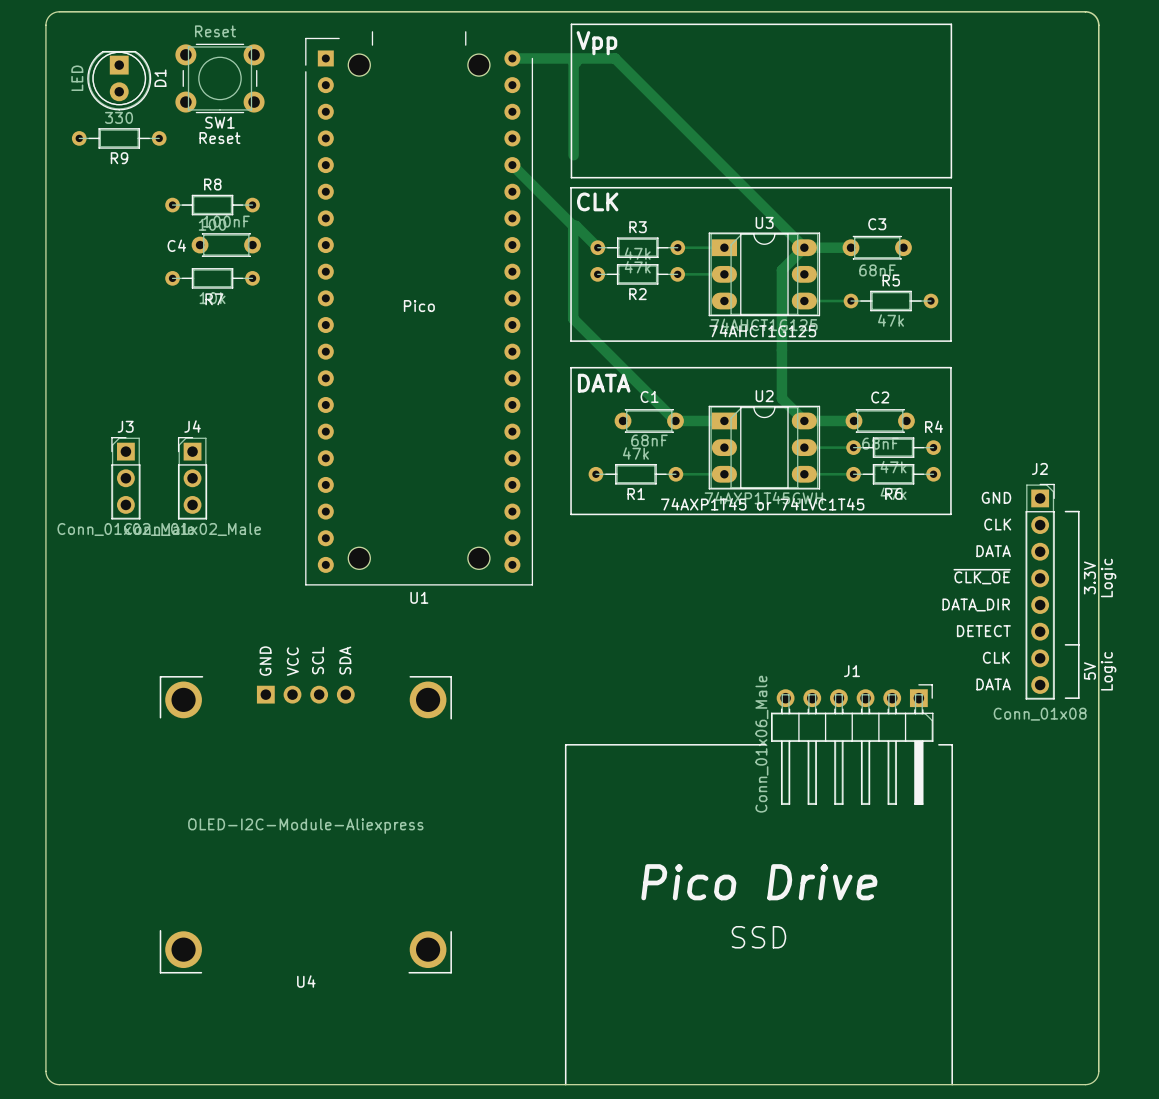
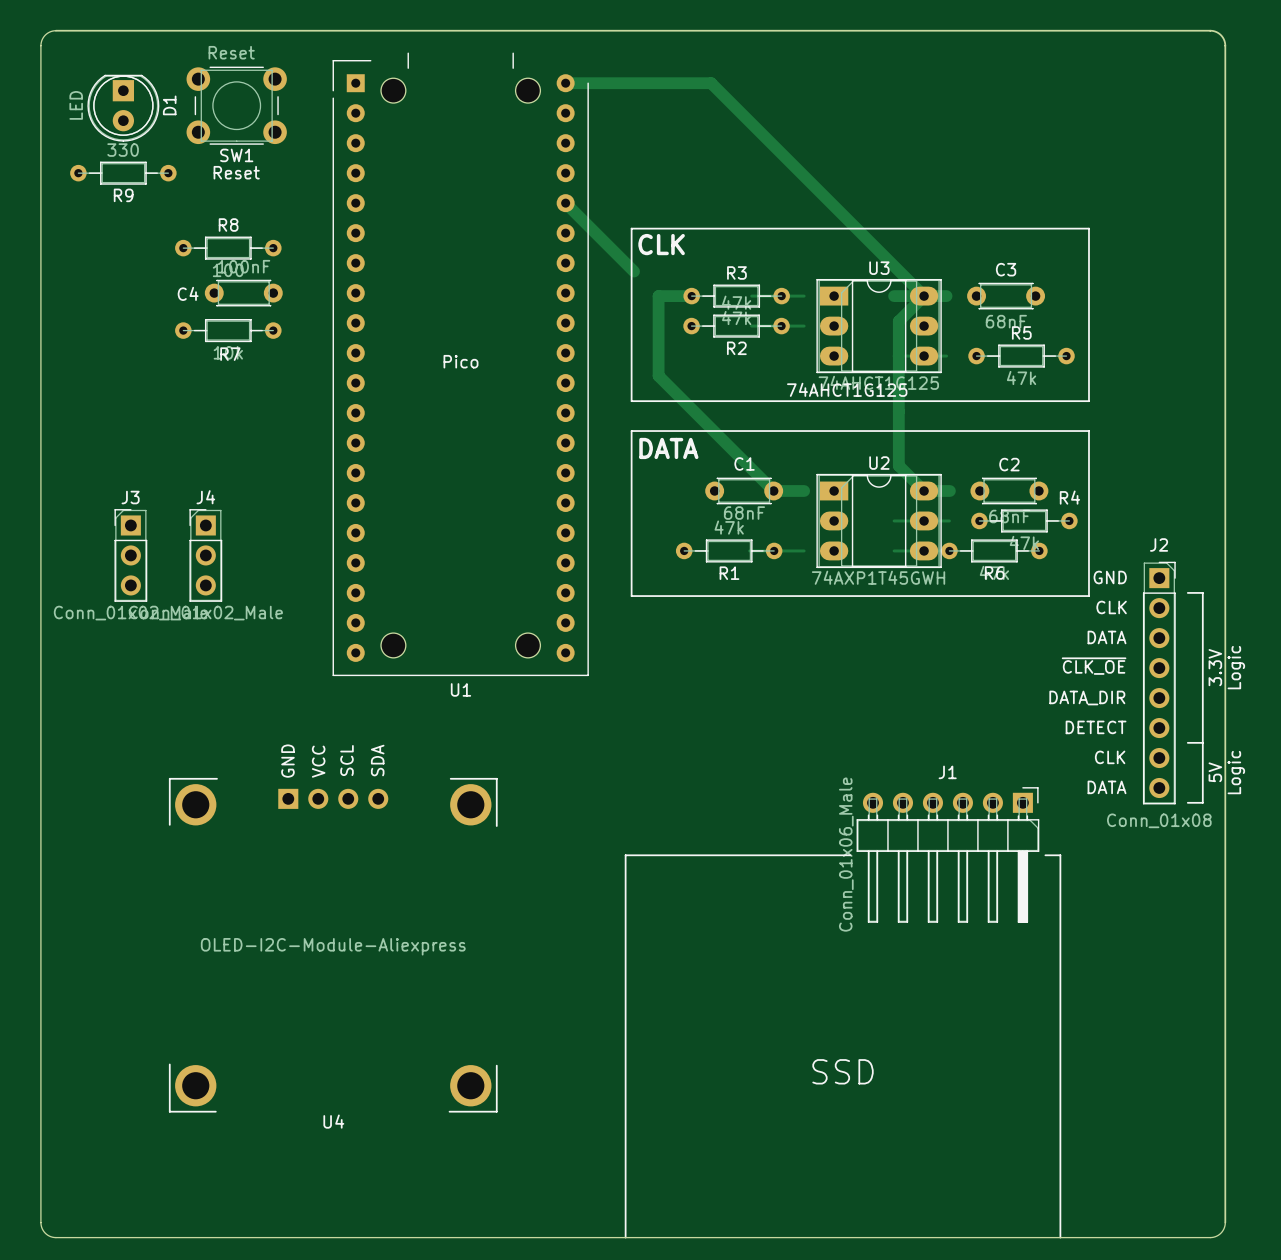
line: (571, 24) (951, 24) (951, 177) (571, 177) (571, 24) -> none
text: Vpp (596, 43) -> none
track: (615, 58) (804, 247) (781, 270) (781, 398) (804, 420) (831, 420) -> (681, 83) (711, 83) (924, 296) (898, 321) (898, 465) (924, 490)
track: (576, 62) (573, 62) (573, 155) -> none
line: (950, 187) (950, 341) -> (1059, 228) (1088, 228) (1088, 401) (1059, 401)
track: (597, 247) (575, 225) (573, 225) (573, 318) (675, 420) (697, 420) -> (691, 296) (658, 296) (658, 375) (773, 490)
R3 position: (637, 247) -> (736, 296)
C3 position: (877, 247) -> (1006, 296)
R2 position: (637, 274) -> (736, 326)
U3 position: (764, 274) -> (879, 326)
R5 position: (890, 301) -> (1021, 356)
line: (571, 367) (950, 367) (950, 514) (571, 514) -> (631, 431) (1088, 431) (1088, 596) (631, 596)
C1 position: (649, 420) -> (744, 490)
C2 position: (880, 420) -> (1009, 490)
U2 position: (764, 447) -> (879, 520)
R4 position: (893, 447) -> (1024, 520)
R1 position: (635, 474) -> (729, 550)
text: 74AXP1T45 or 74LVC1T45 (762, 504) -> none
text: Pico Drive (759, 882) -> none

